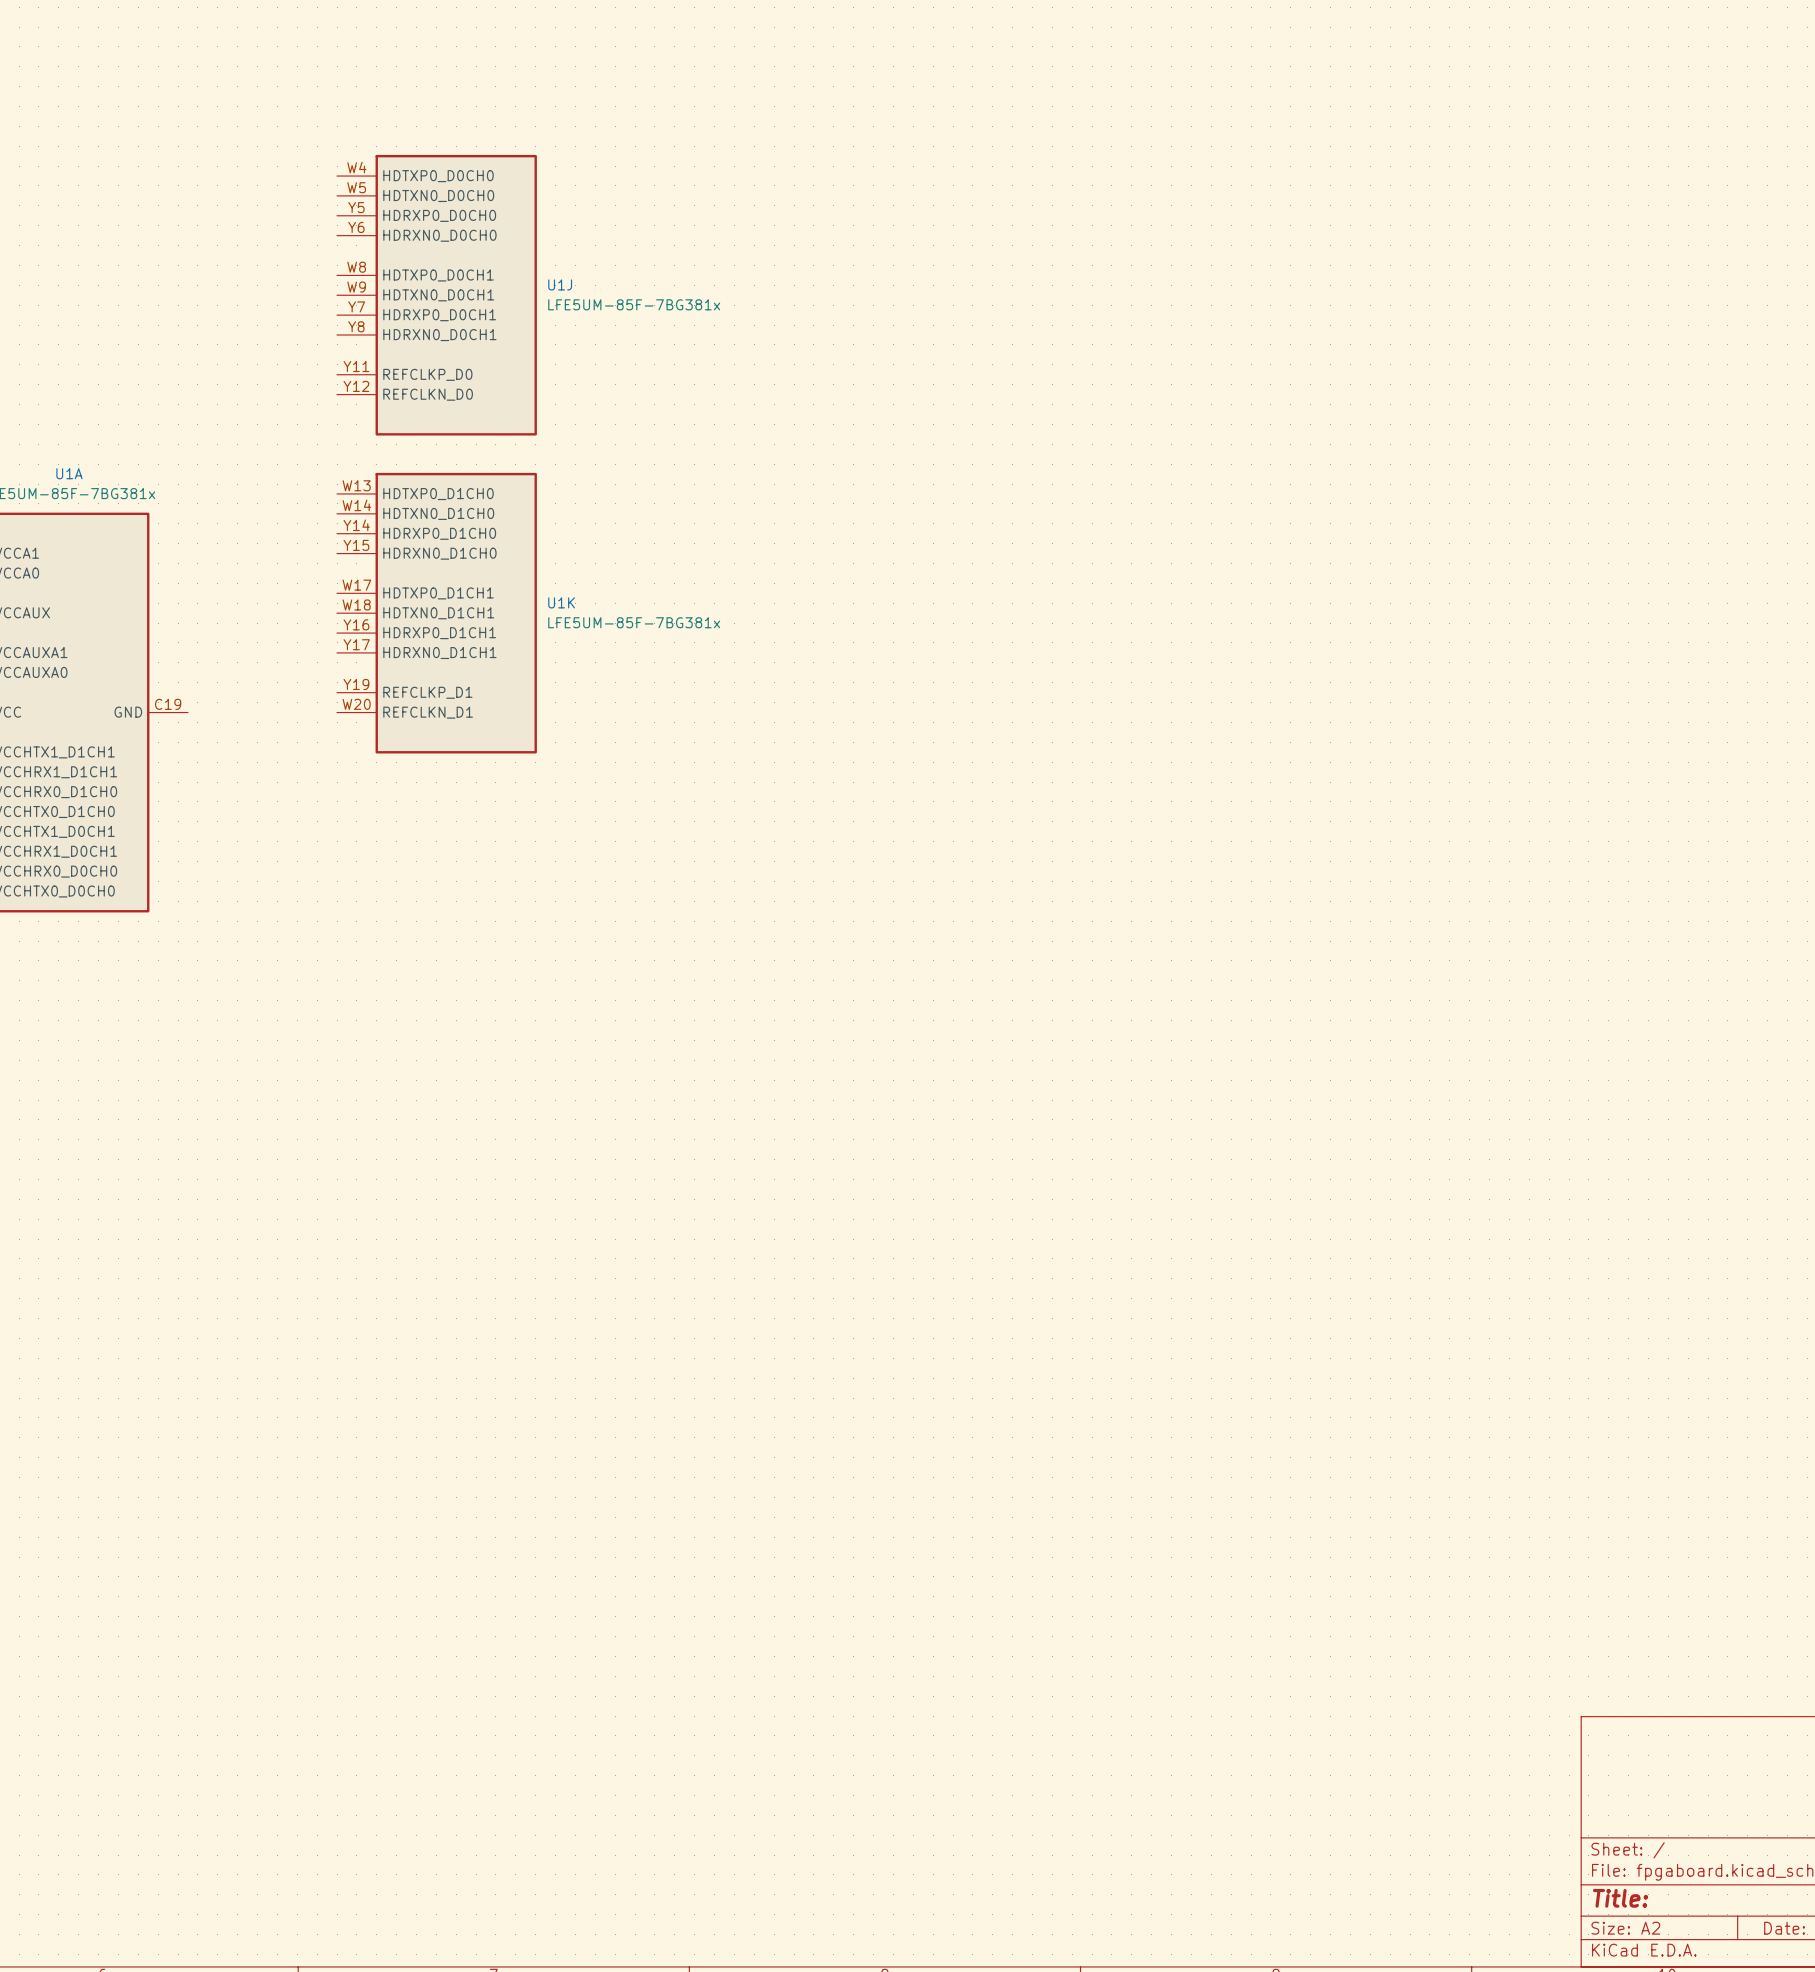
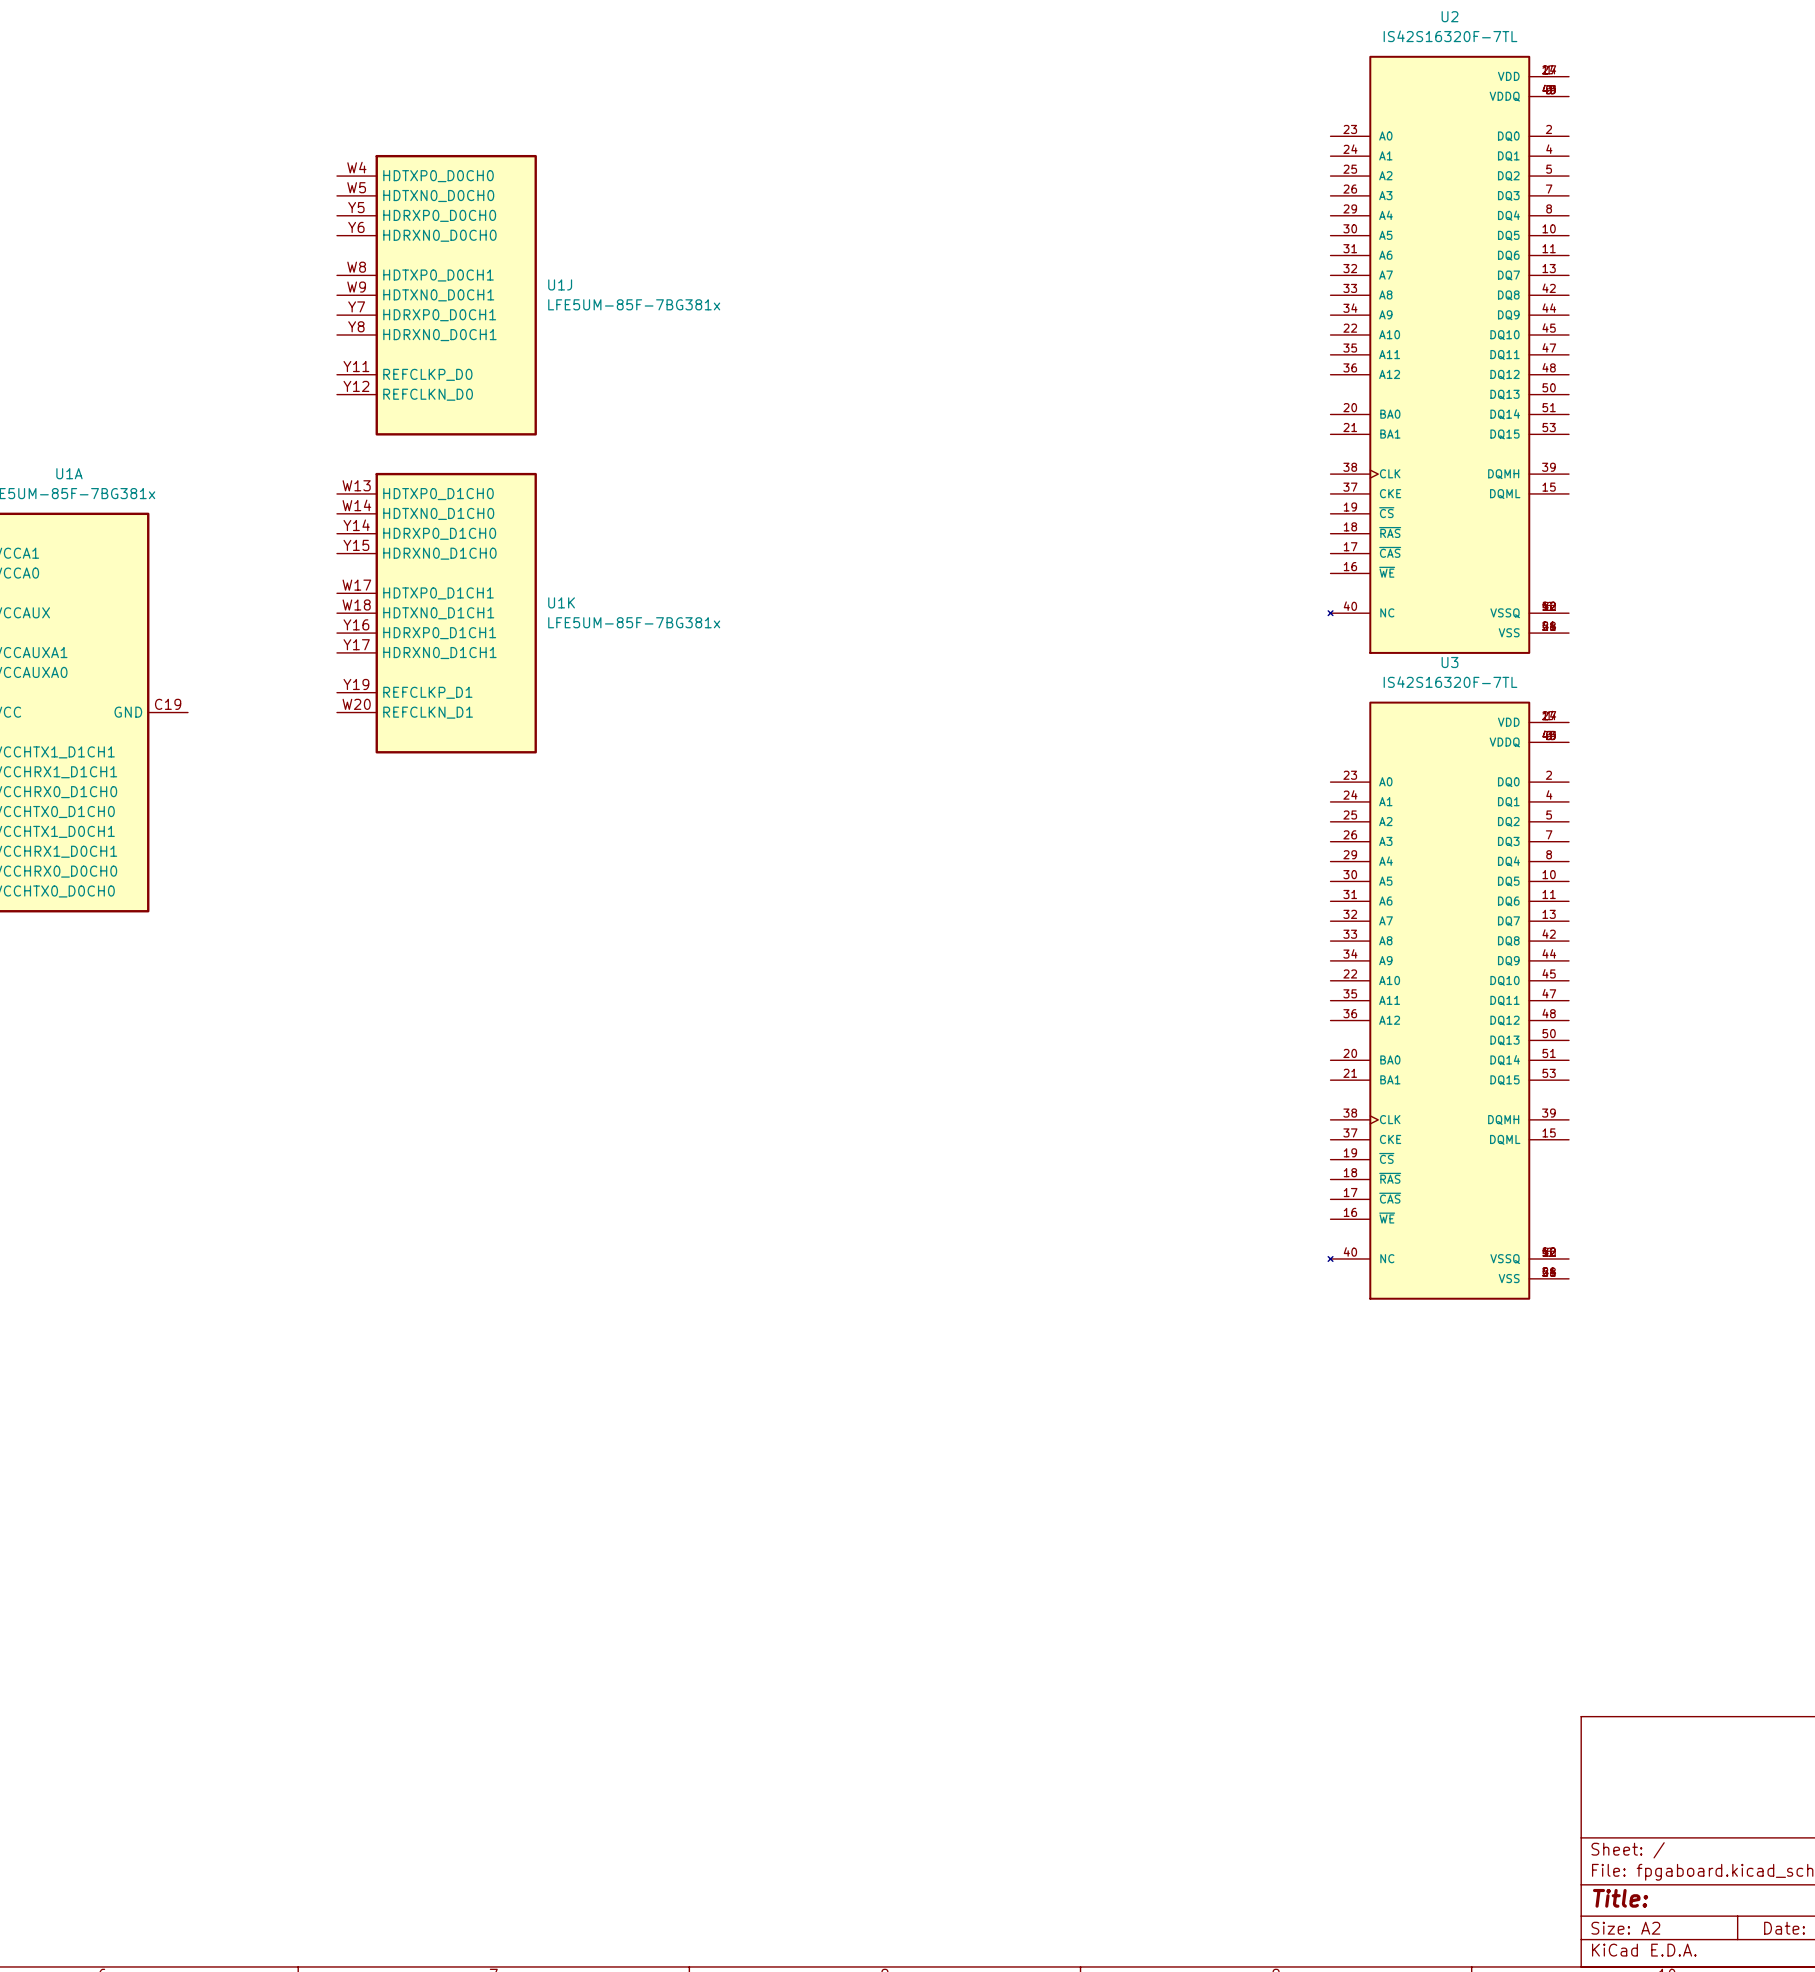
U2: none -> IS42S16320F-7TL (1448, 354)
U3: none -> IS42S16320F-7TL (1448, 1000)

